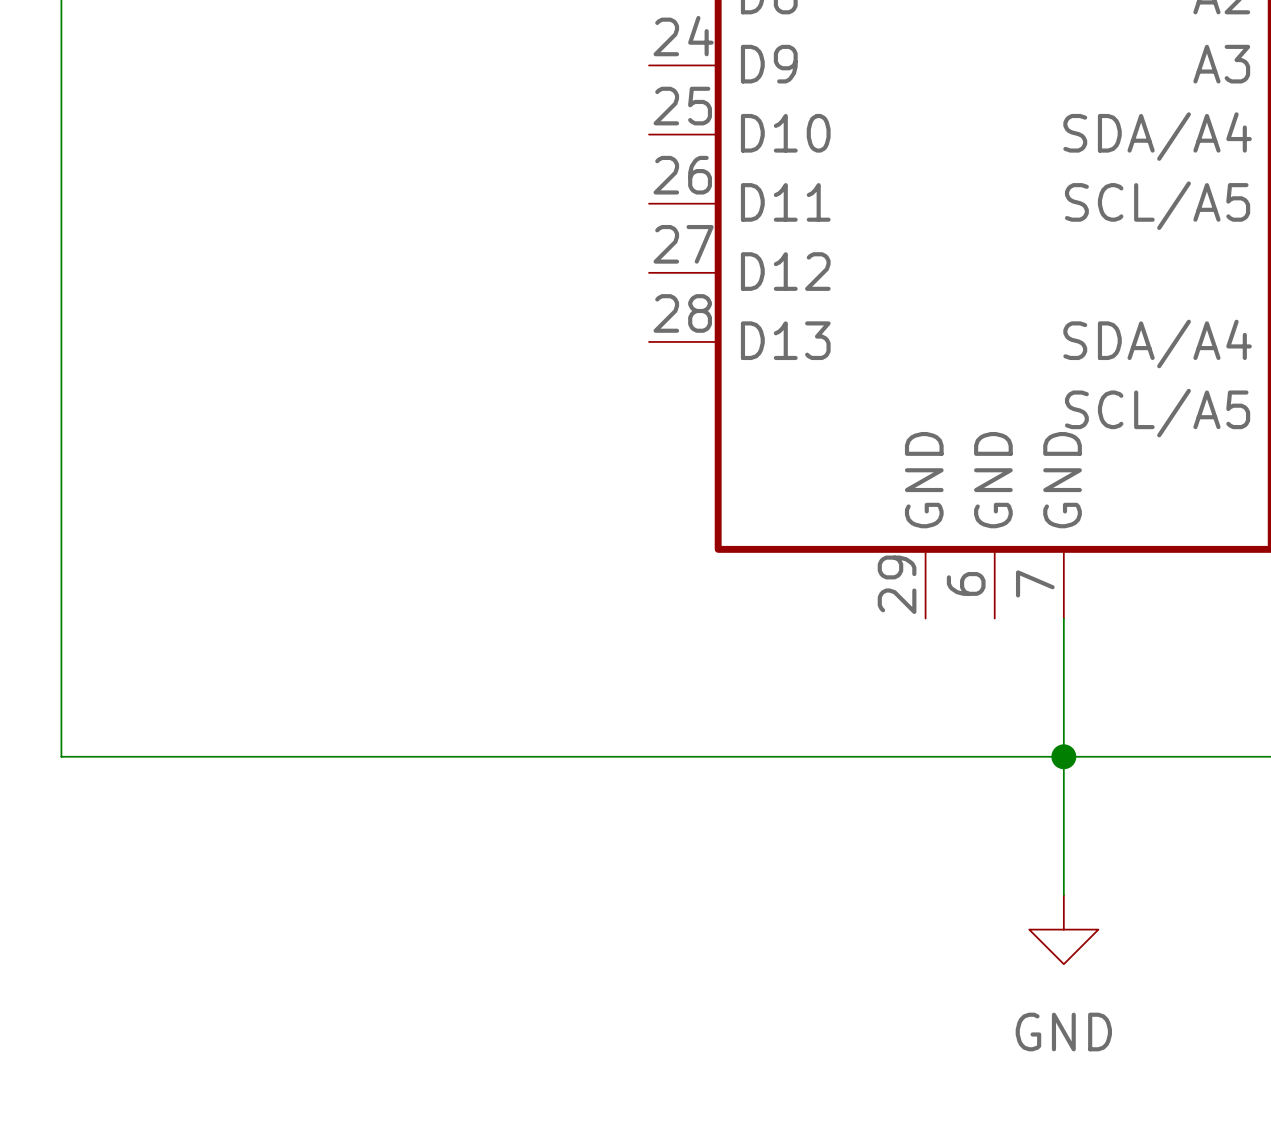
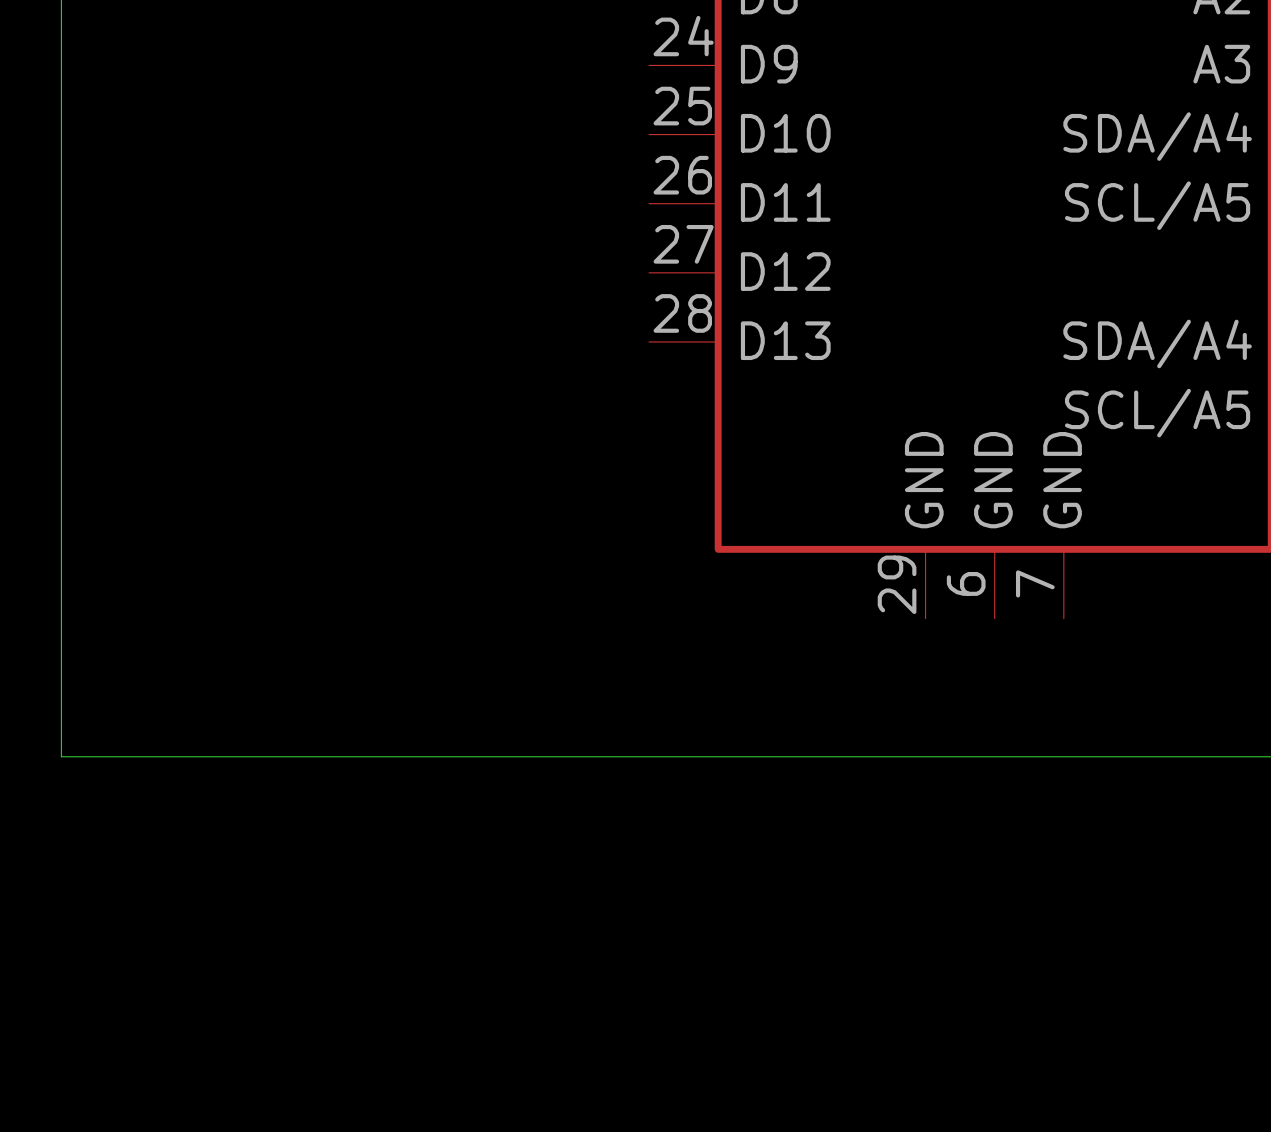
wire: (1063, 618) (1063, 895) -> none
junction: (1063, 756) -> none
power symbol: GND (1063, 929) -> none

